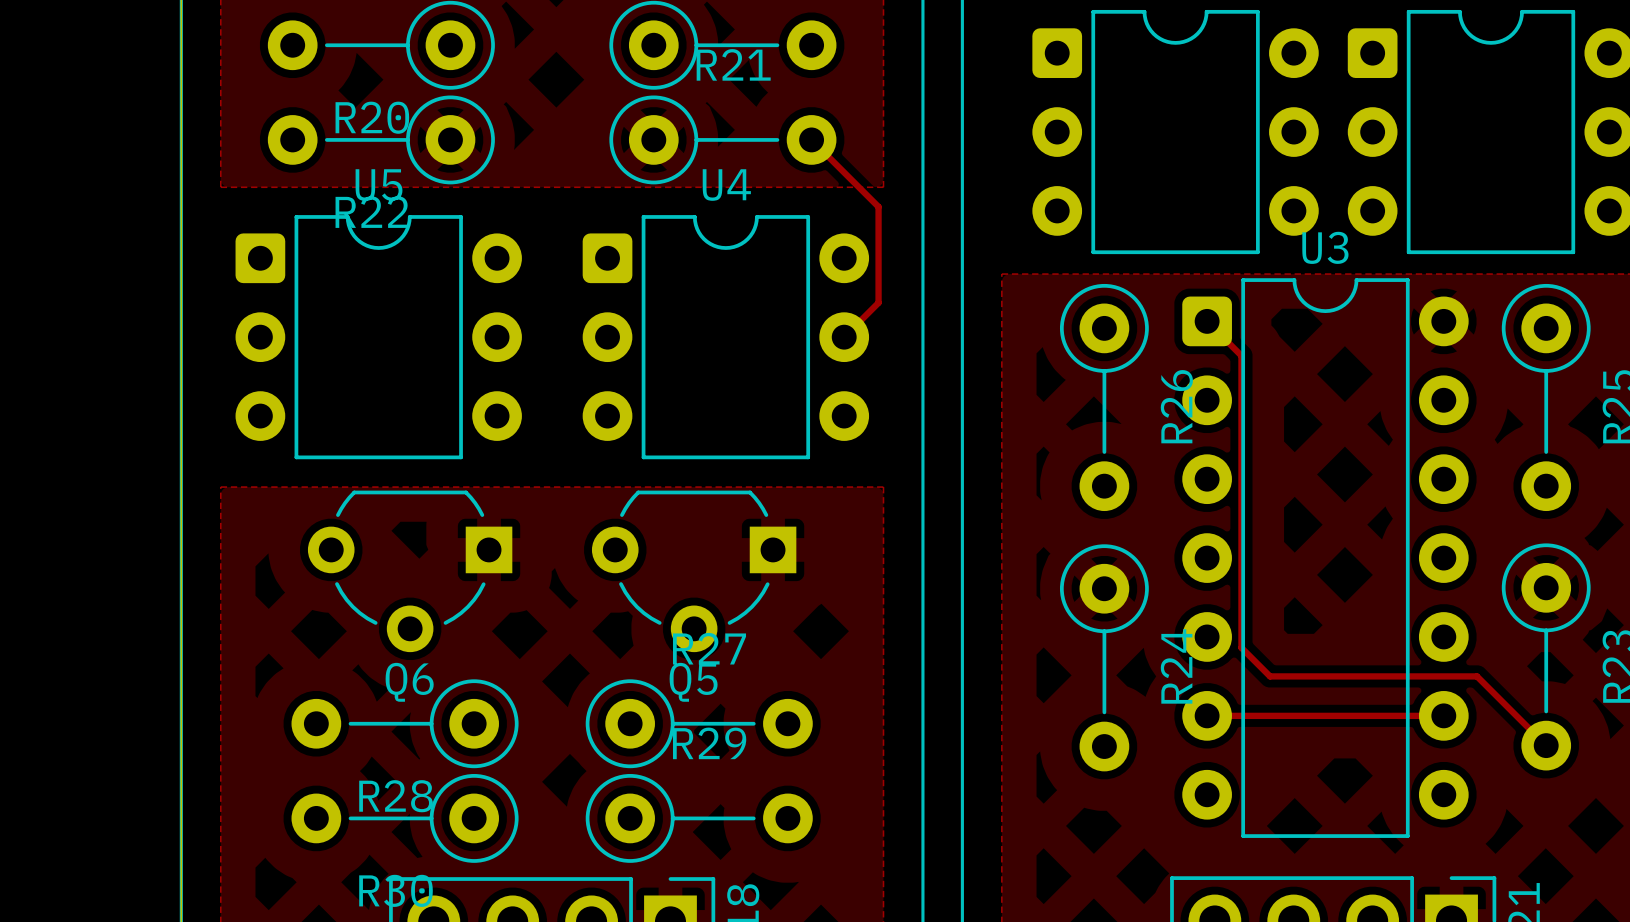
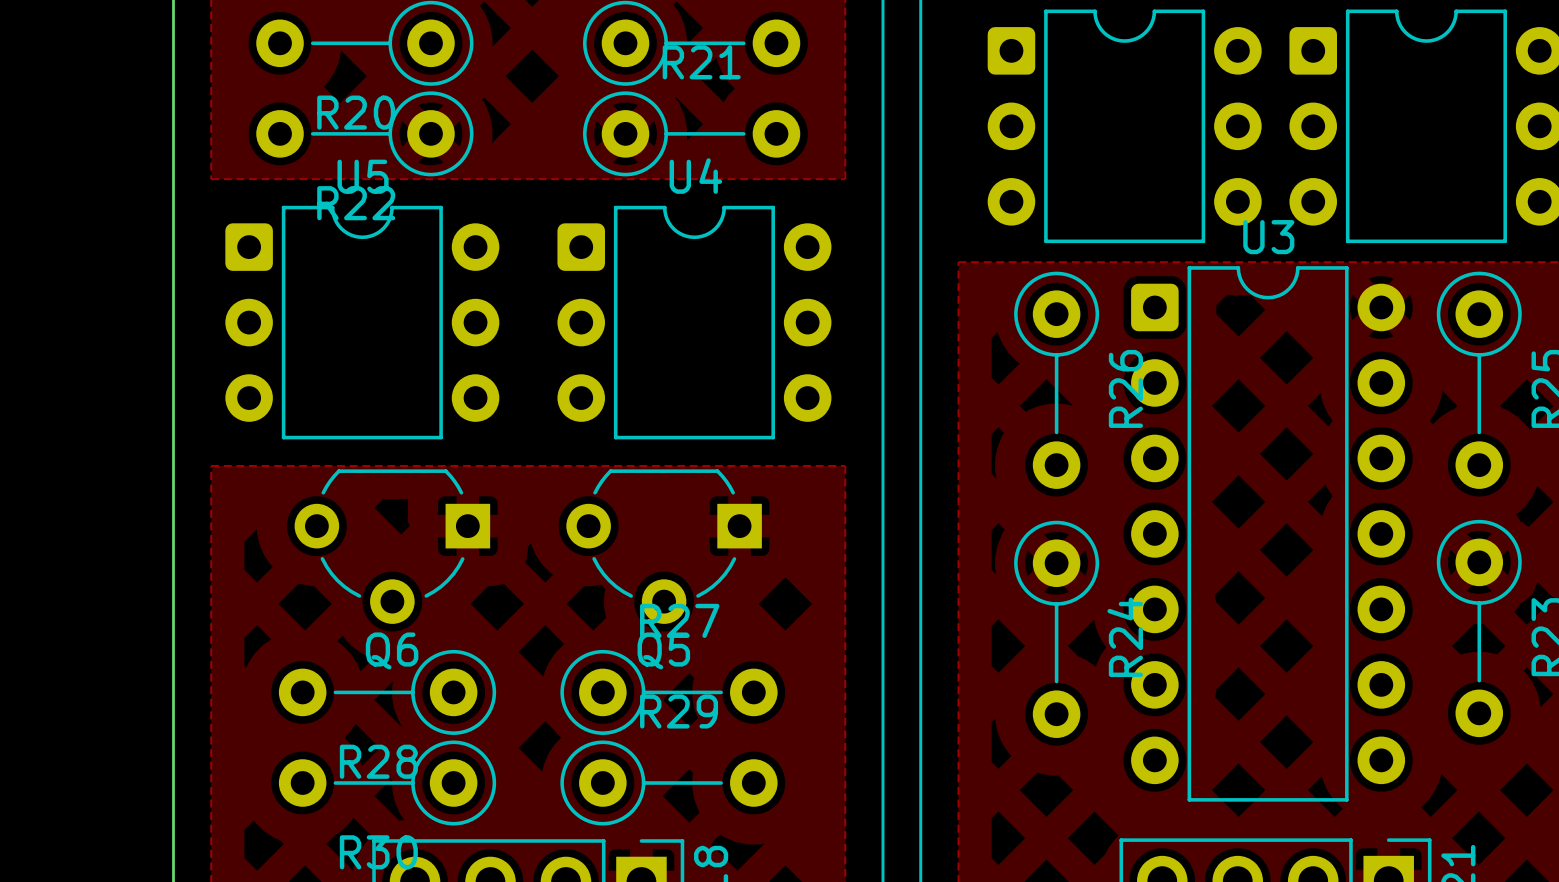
track: (811, 139) (878, 206) (878, 302) (844, 337) -> none
track: (1207, 321) (1241, 355) (1241, 647) (1270, 676) (1477, 676) (1546, 745) -> none
track: (1207, 715) (1443, 715) -> none

